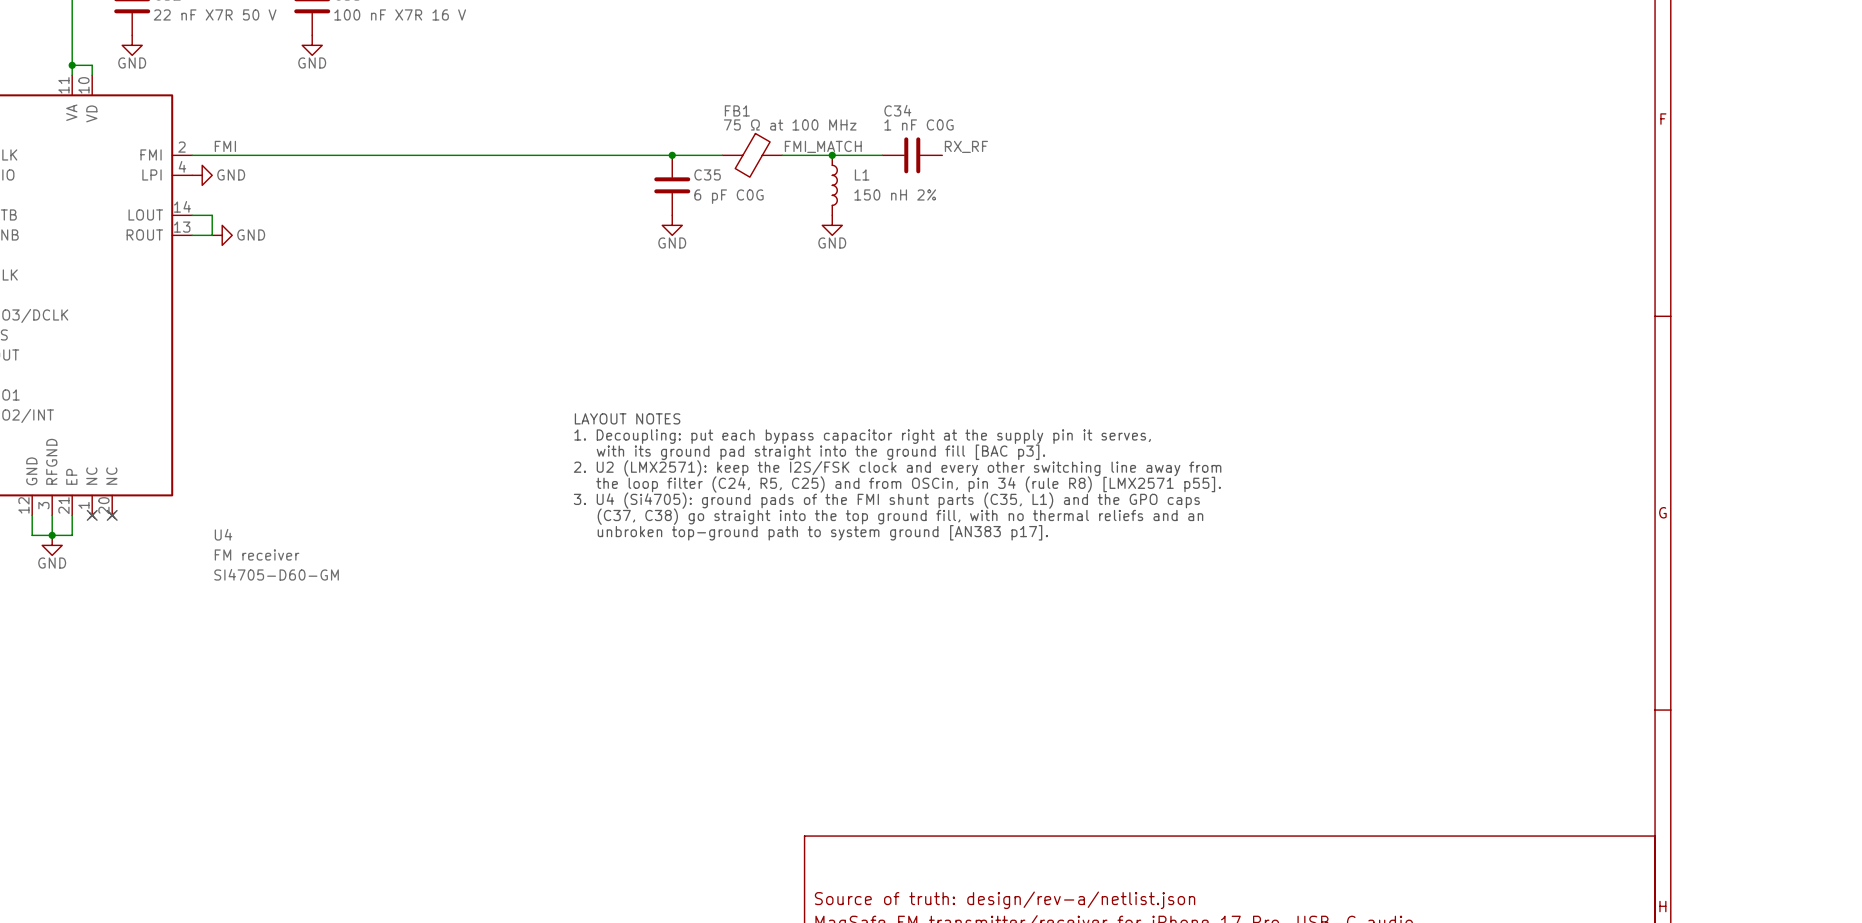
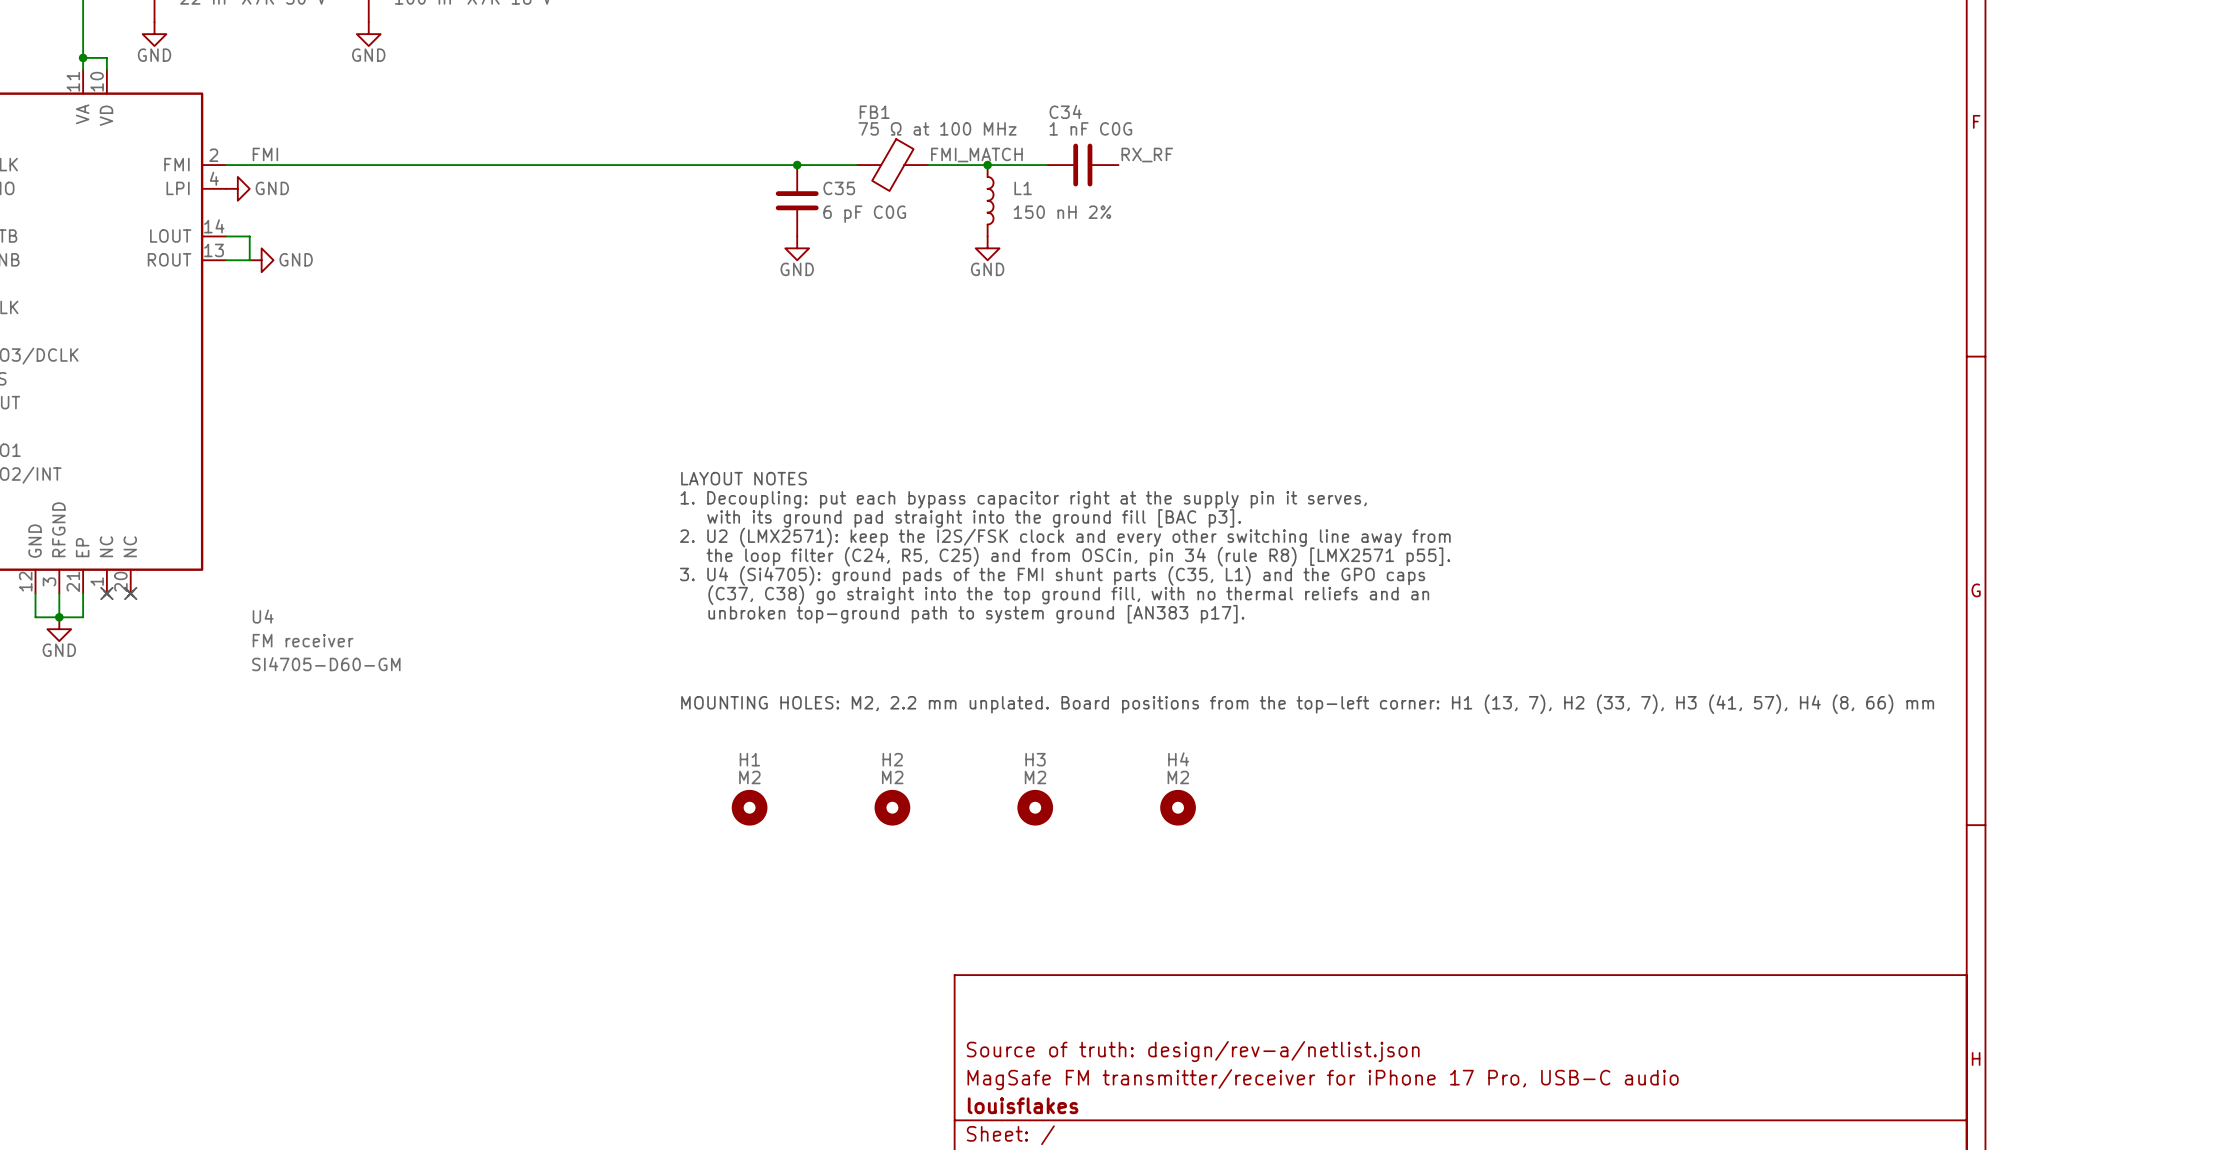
text: none -> MOUNTING HOLES: M2, 2.2 mm unplated. Board positions from the top-left corner: H1 (13, 7), H2 (33, 7), H3 (41, 57), H4 (8, 66) mm (1307, 704)
H1: none -> M2 (749, 807)
H2: none -> M2 (892, 807)
H3: none -> M2 (1035, 807)
H4: none -> M2 (1178, 807)

